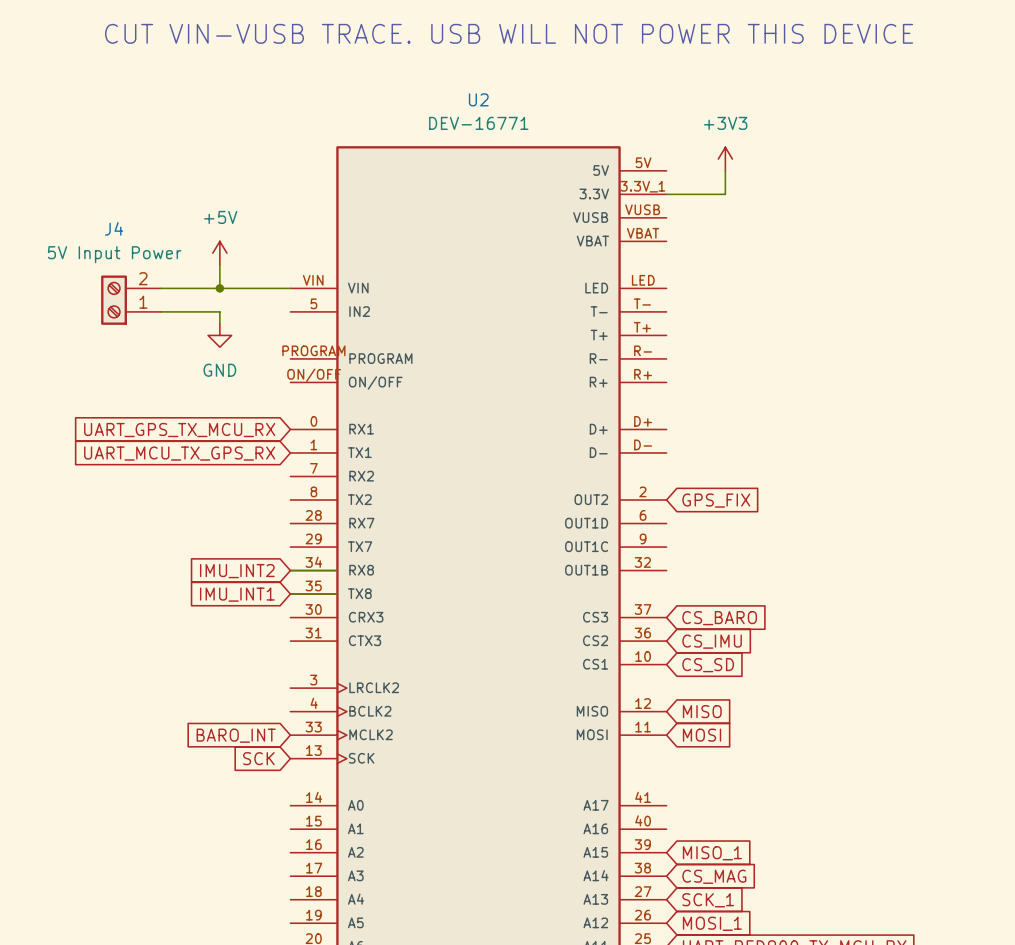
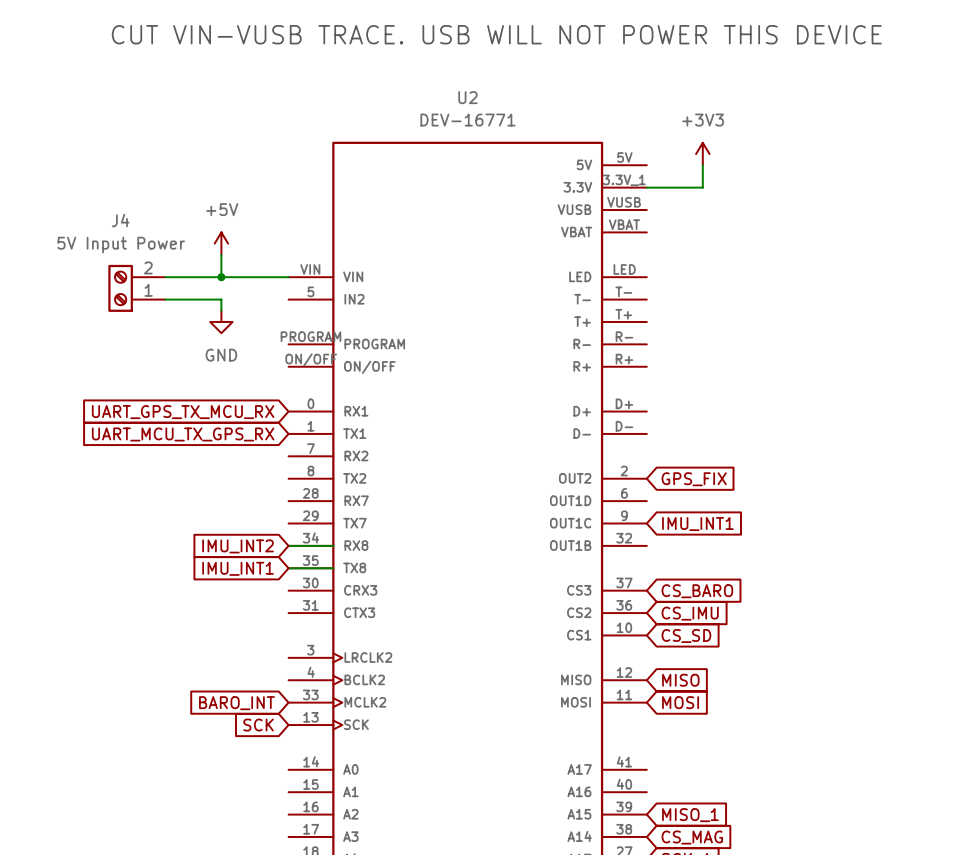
global label: none -> IMU_INT1 (697, 524)

